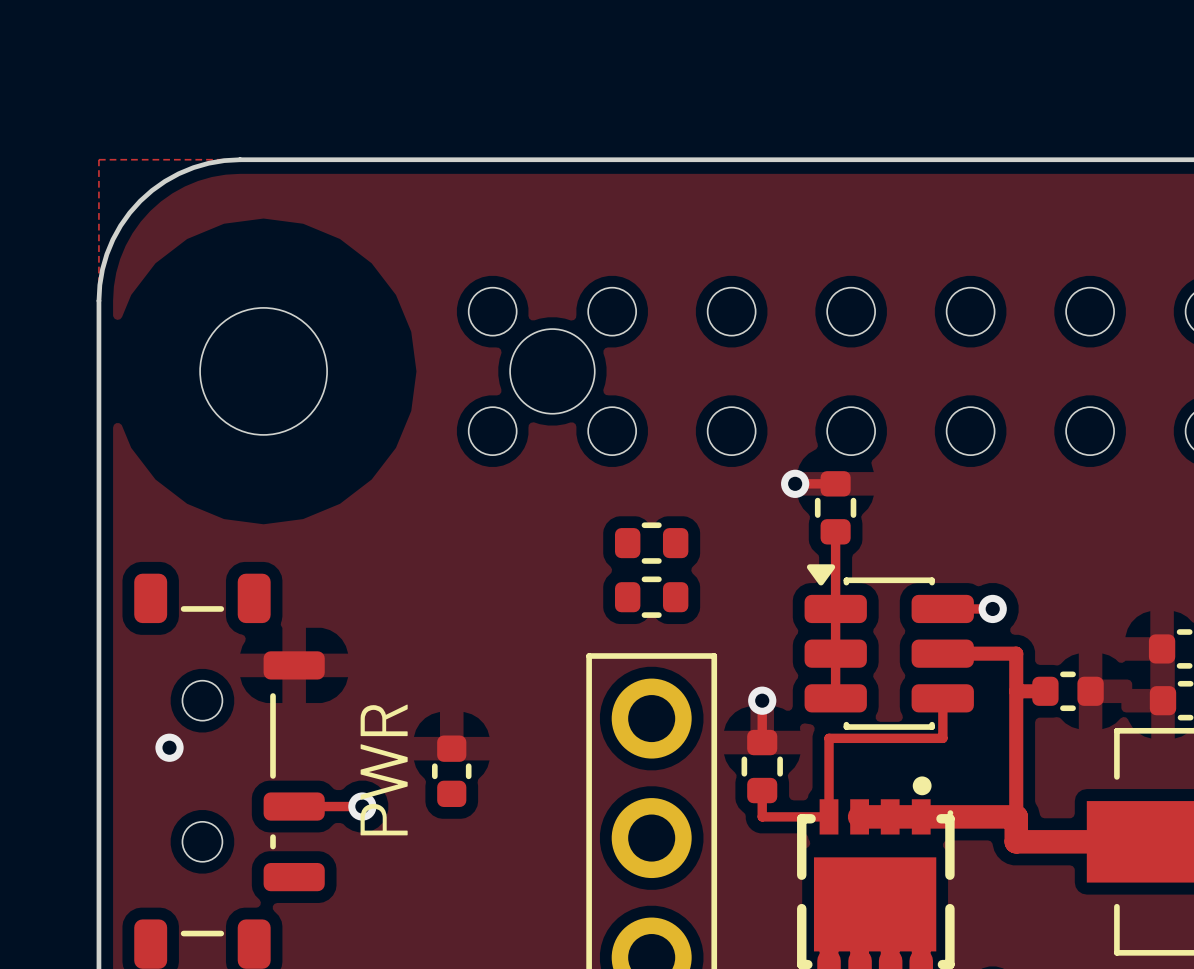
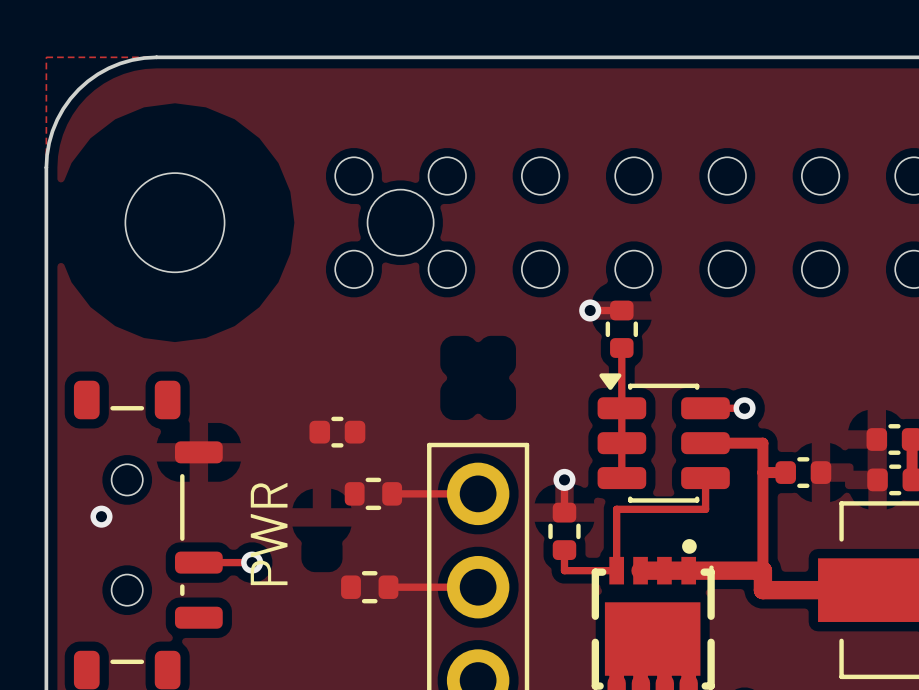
part: (651, 543) -> none
part: (651, 597) -> none
part: none -> (373, 493)
track: none -> (478, 493) (392, 494)
part rotation: 0° (451, 771) -> 90° clockwise (337, 432)
part position: (451, 771) -> (337, 432)
track: none -> (388, 586) (478, 587)
part: none -> (369, 587)

